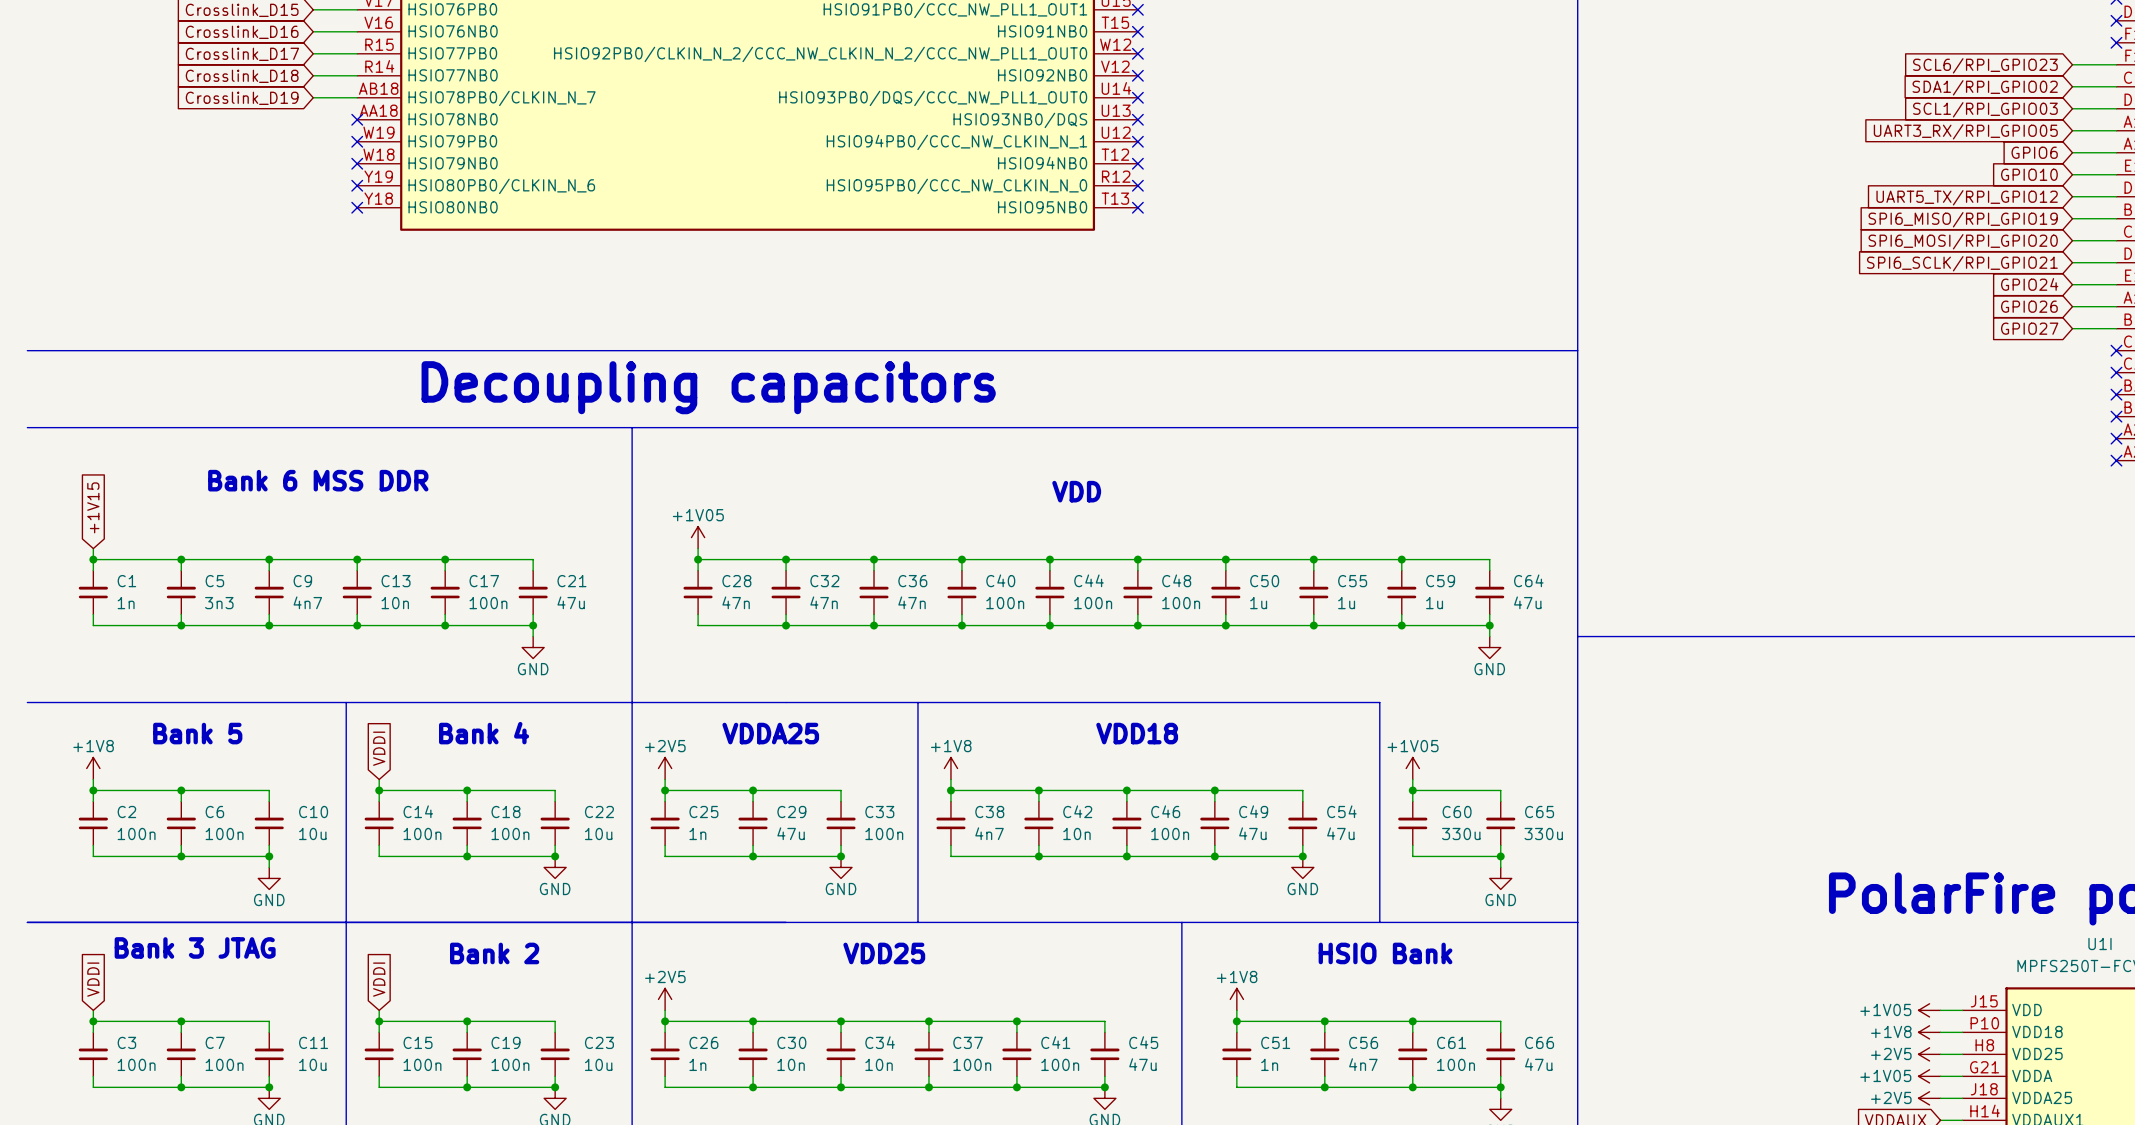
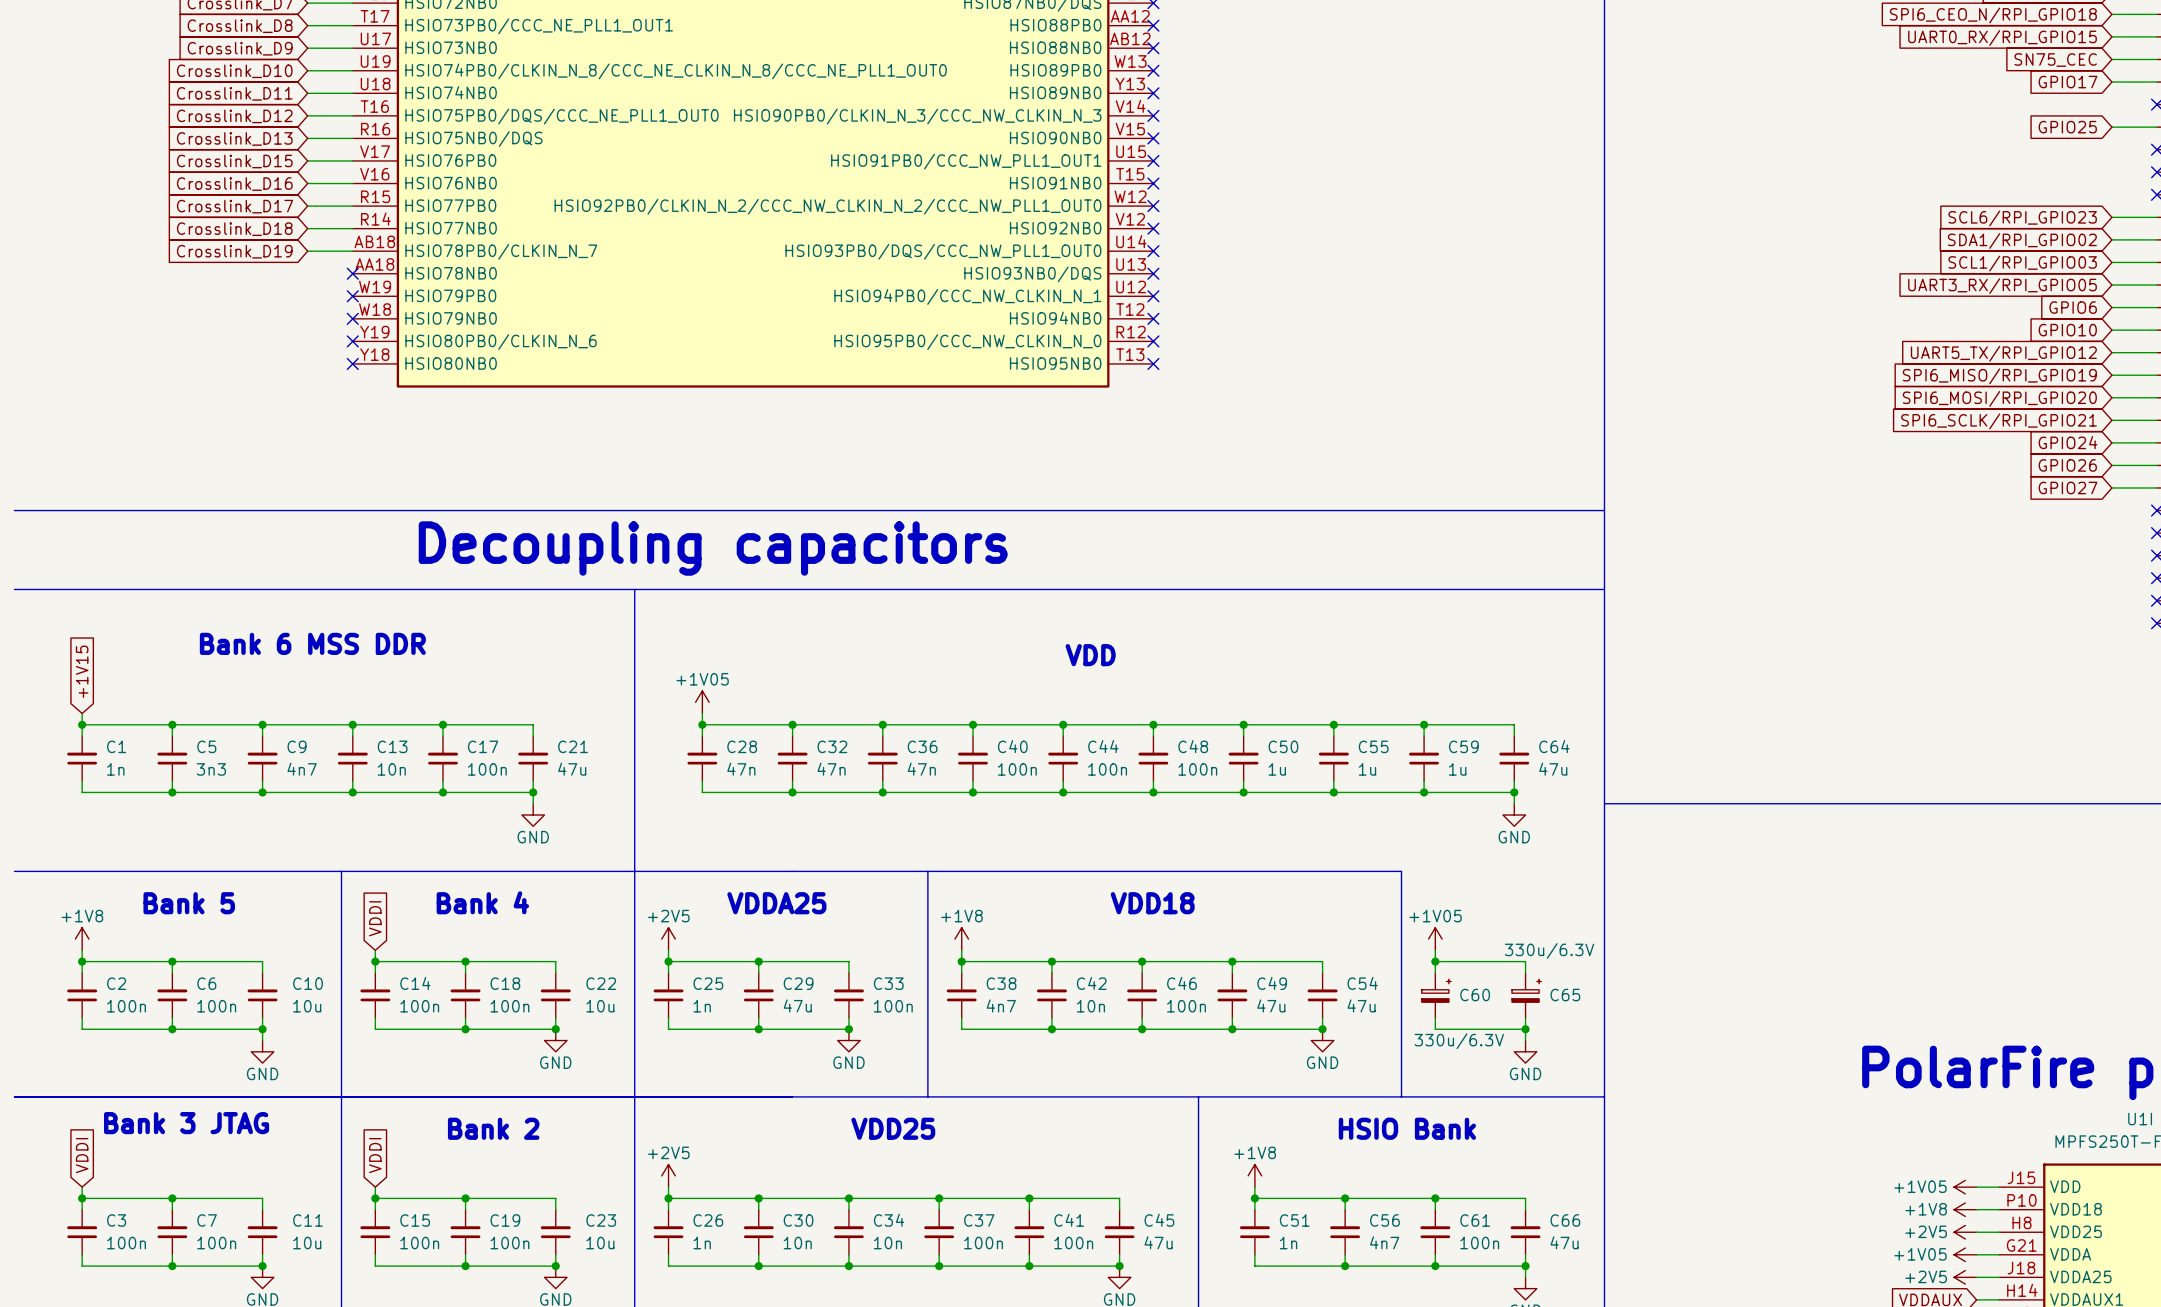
C60 symbol: [1398, 801, 1428, 846] -> [1421, 972, 1452, 1018]
C65 symbol: [1486, 801, 1516, 846] -> [1512, 972, 1542, 1018]
C60 text: 330u (1461, 833) -> 330u/6.3V (1459, 1041)
C65 text: 330u (1543, 833) -> 330u/6.3V (1549, 950)

